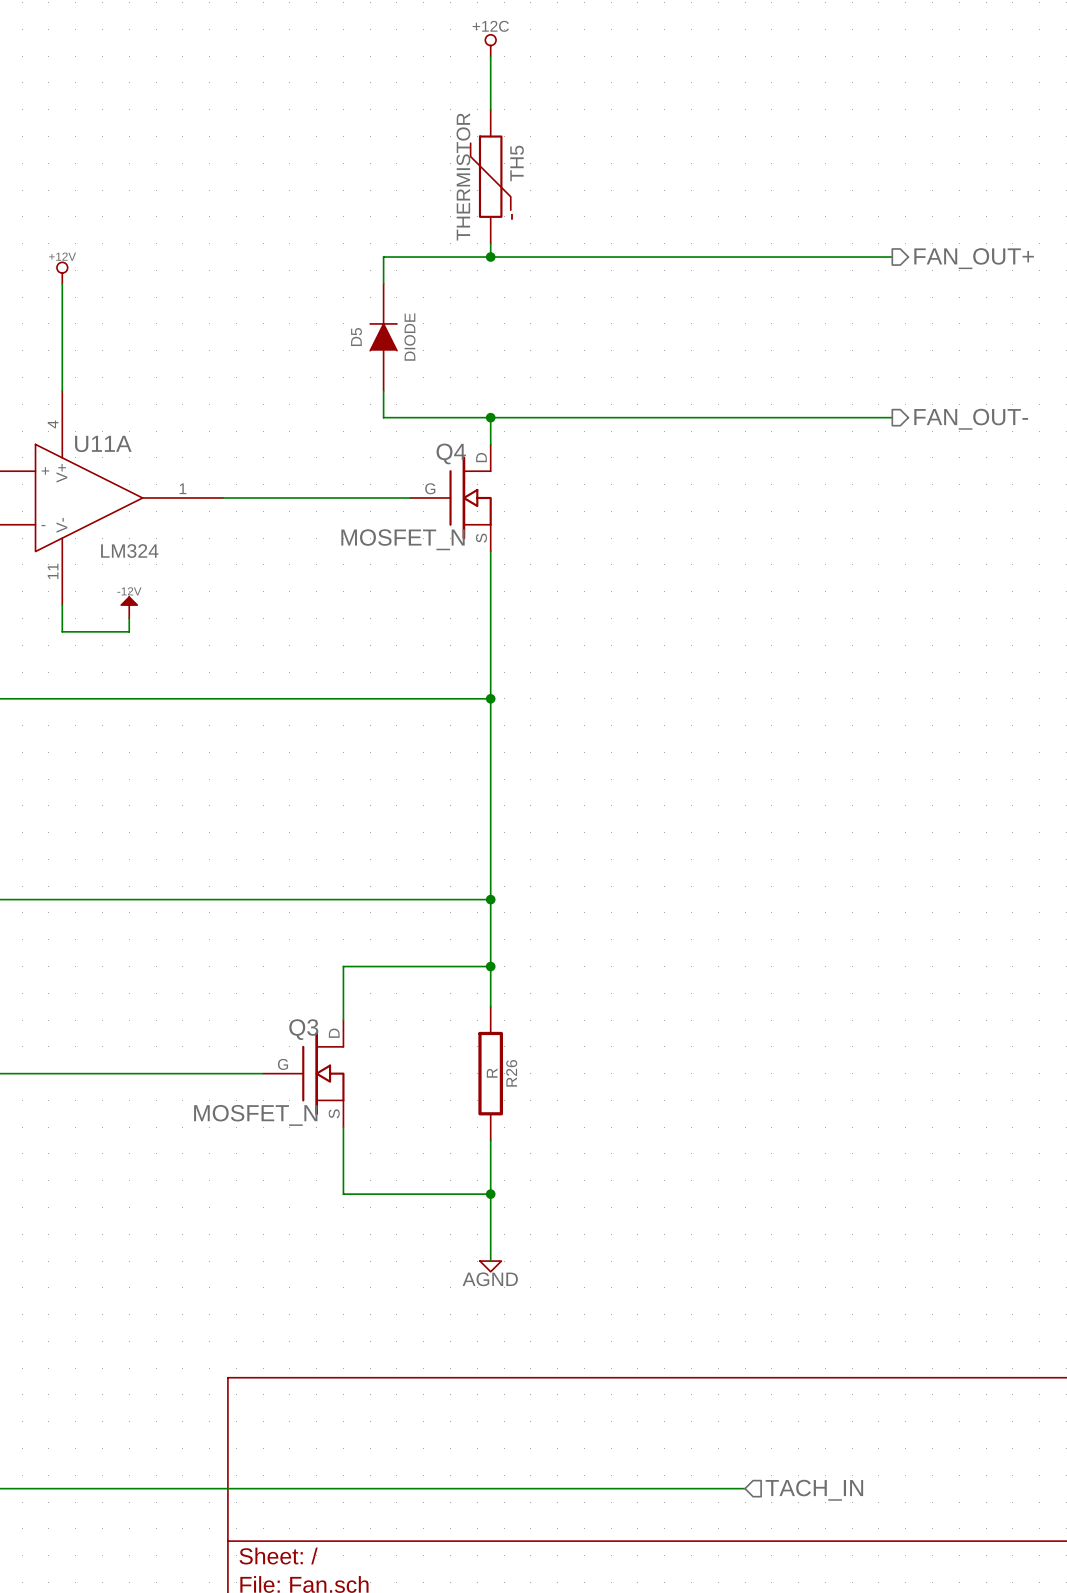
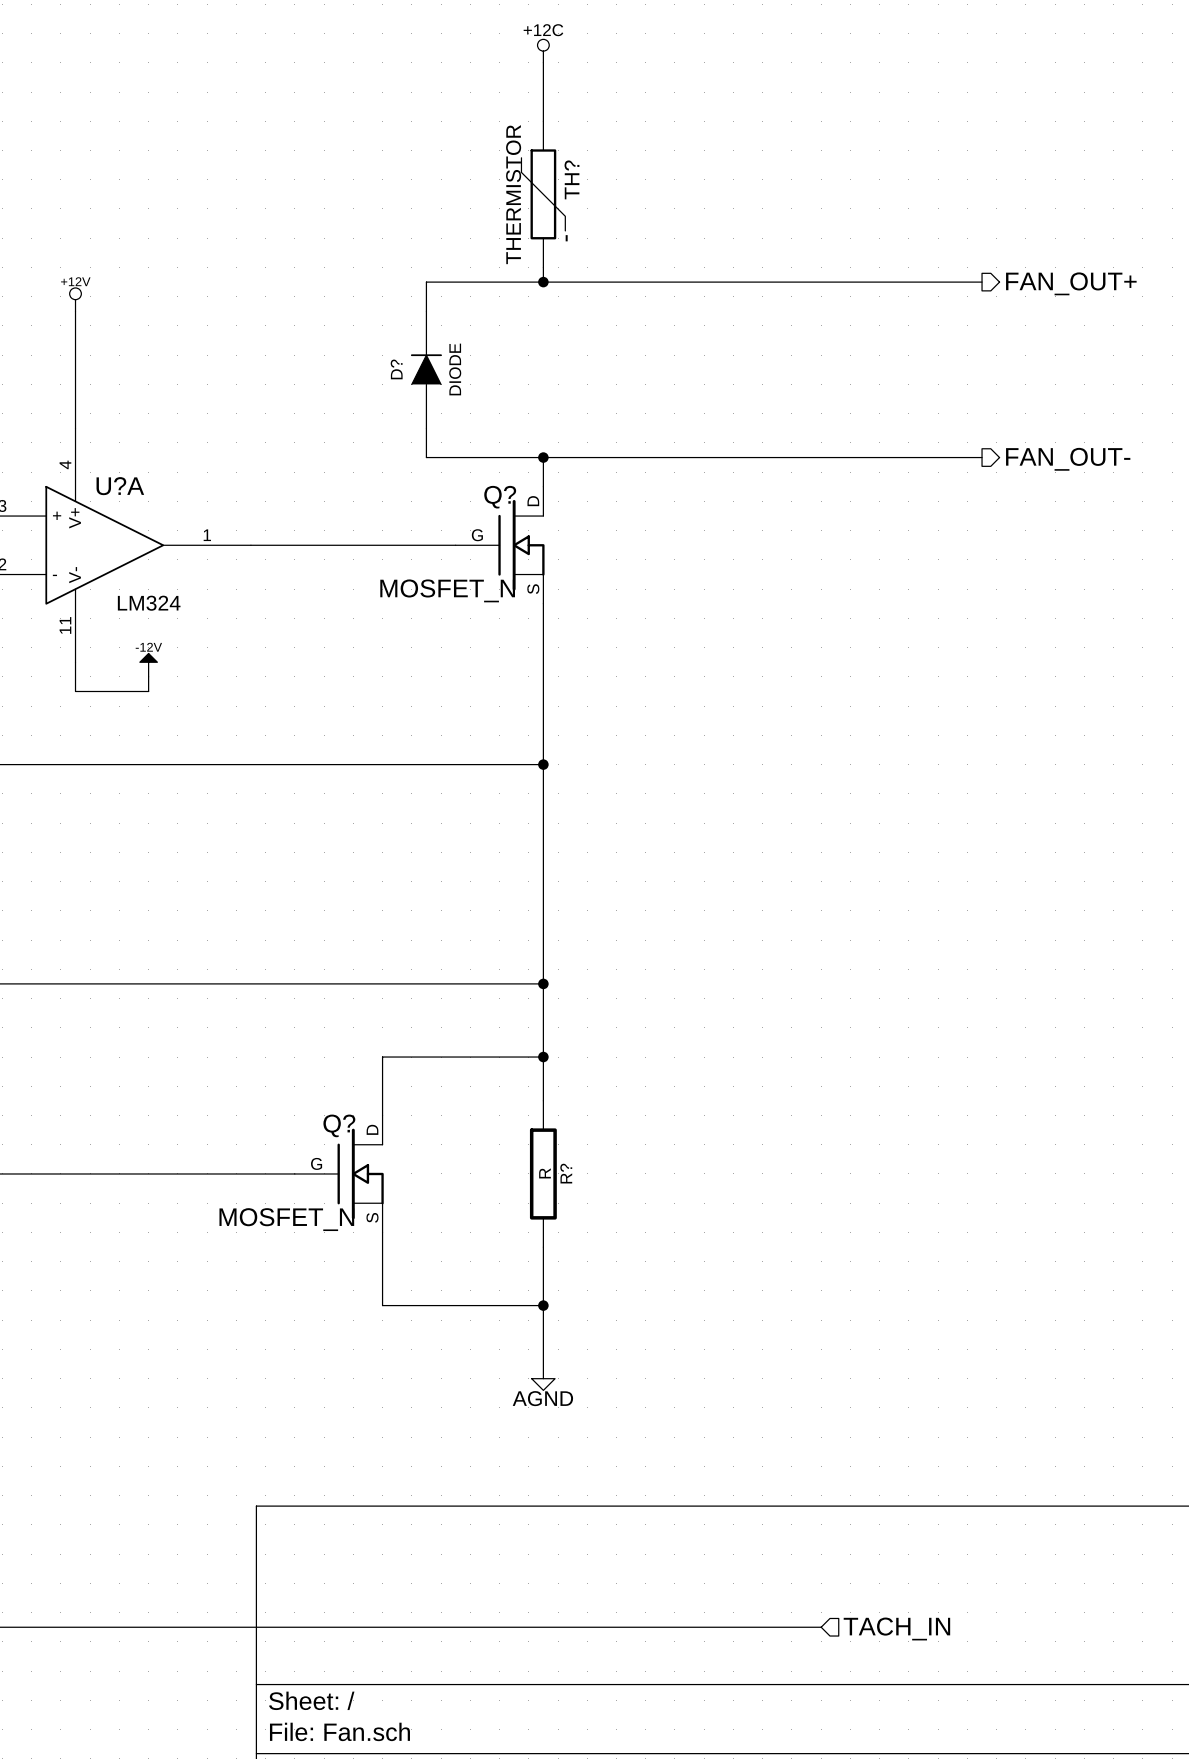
TH5 name: TH5 (517, 163) -> TH? (571, 179)
D5 name: D5 (356, 337) -> D? (396, 369)
U11A name: U11A (103, 443) -> U?A (120, 486)
Q4 name: Q4 (451, 453) -> Q? (500, 497)
Q3 name: Q3 (303, 1029) -> Q? (339, 1125)
R26 name: R26 (511, 1073) -> R? (566, 1173)

